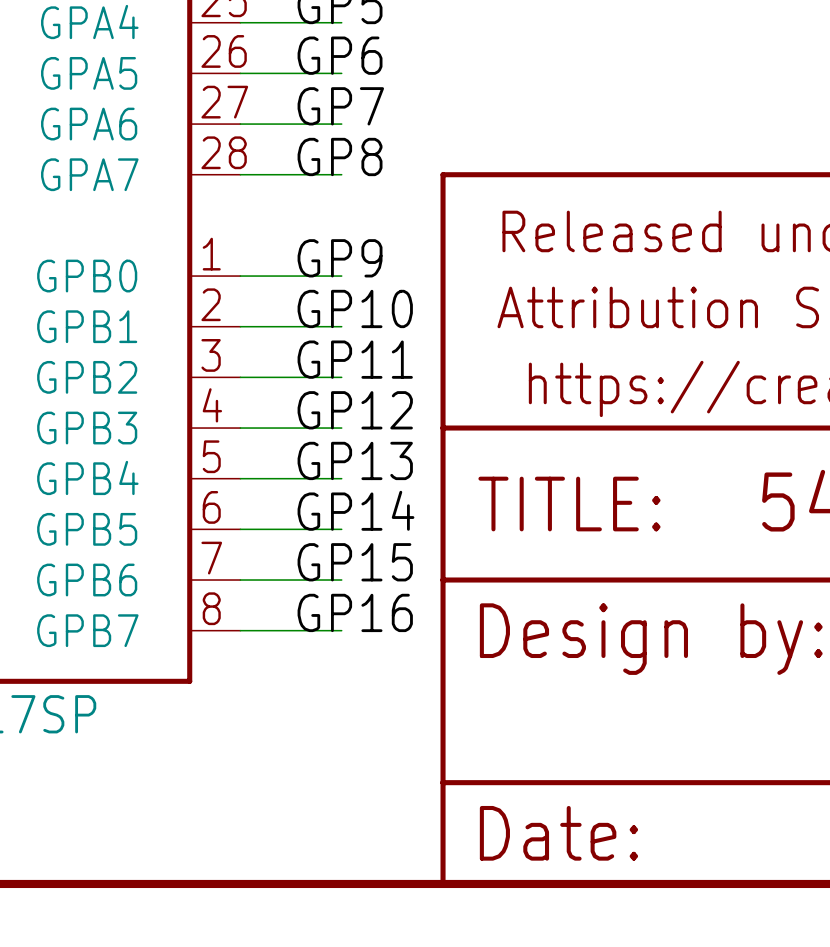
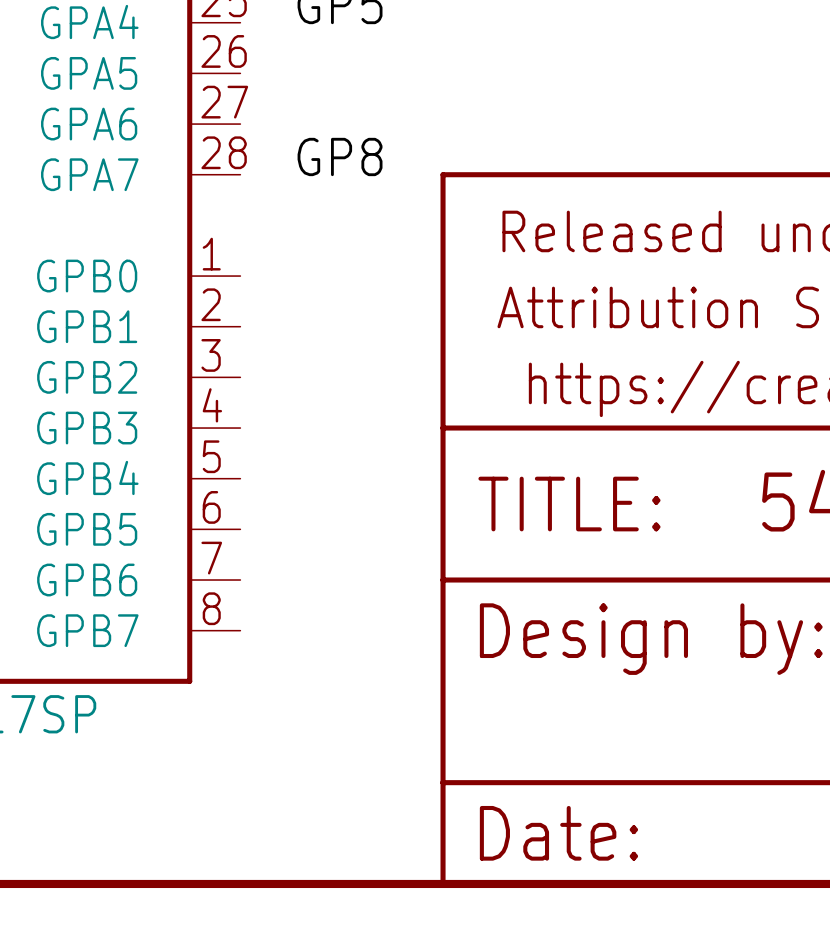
wire: (240, 22) (341, 22) -> none
label: GP6 (340, 55) -> none
wire: (240, 73) (341, 73) -> none
label: GP7 (340, 106) -> none
wire: (240, 124) (341, 124) -> none
wire: (240, 174) (341, 174) -> none
label: GP9 (340, 258) -> none
wire: (240, 276) (341, 276) -> none
label: GP10 (355, 308) -> none
wire: (240, 326) (341, 326) -> none
label: GP11 (355, 359) -> none
wire: (240, 377) (341, 377) -> none
label: GP12 (355, 410) -> none
wire: (240, 428) (341, 428) -> none
label: GP13 (355, 460) -> none
wire: (240, 478) (341, 478) -> none
label: GP14 (355, 510) -> none
wire: (240, 529) (341, 529) -> none
label: GP15 (355, 562) -> none
wire: (240, 580) (341, 580) -> none
label: GP16 (355, 612) -> none
wire: (240, 630) (341, 630) -> none

